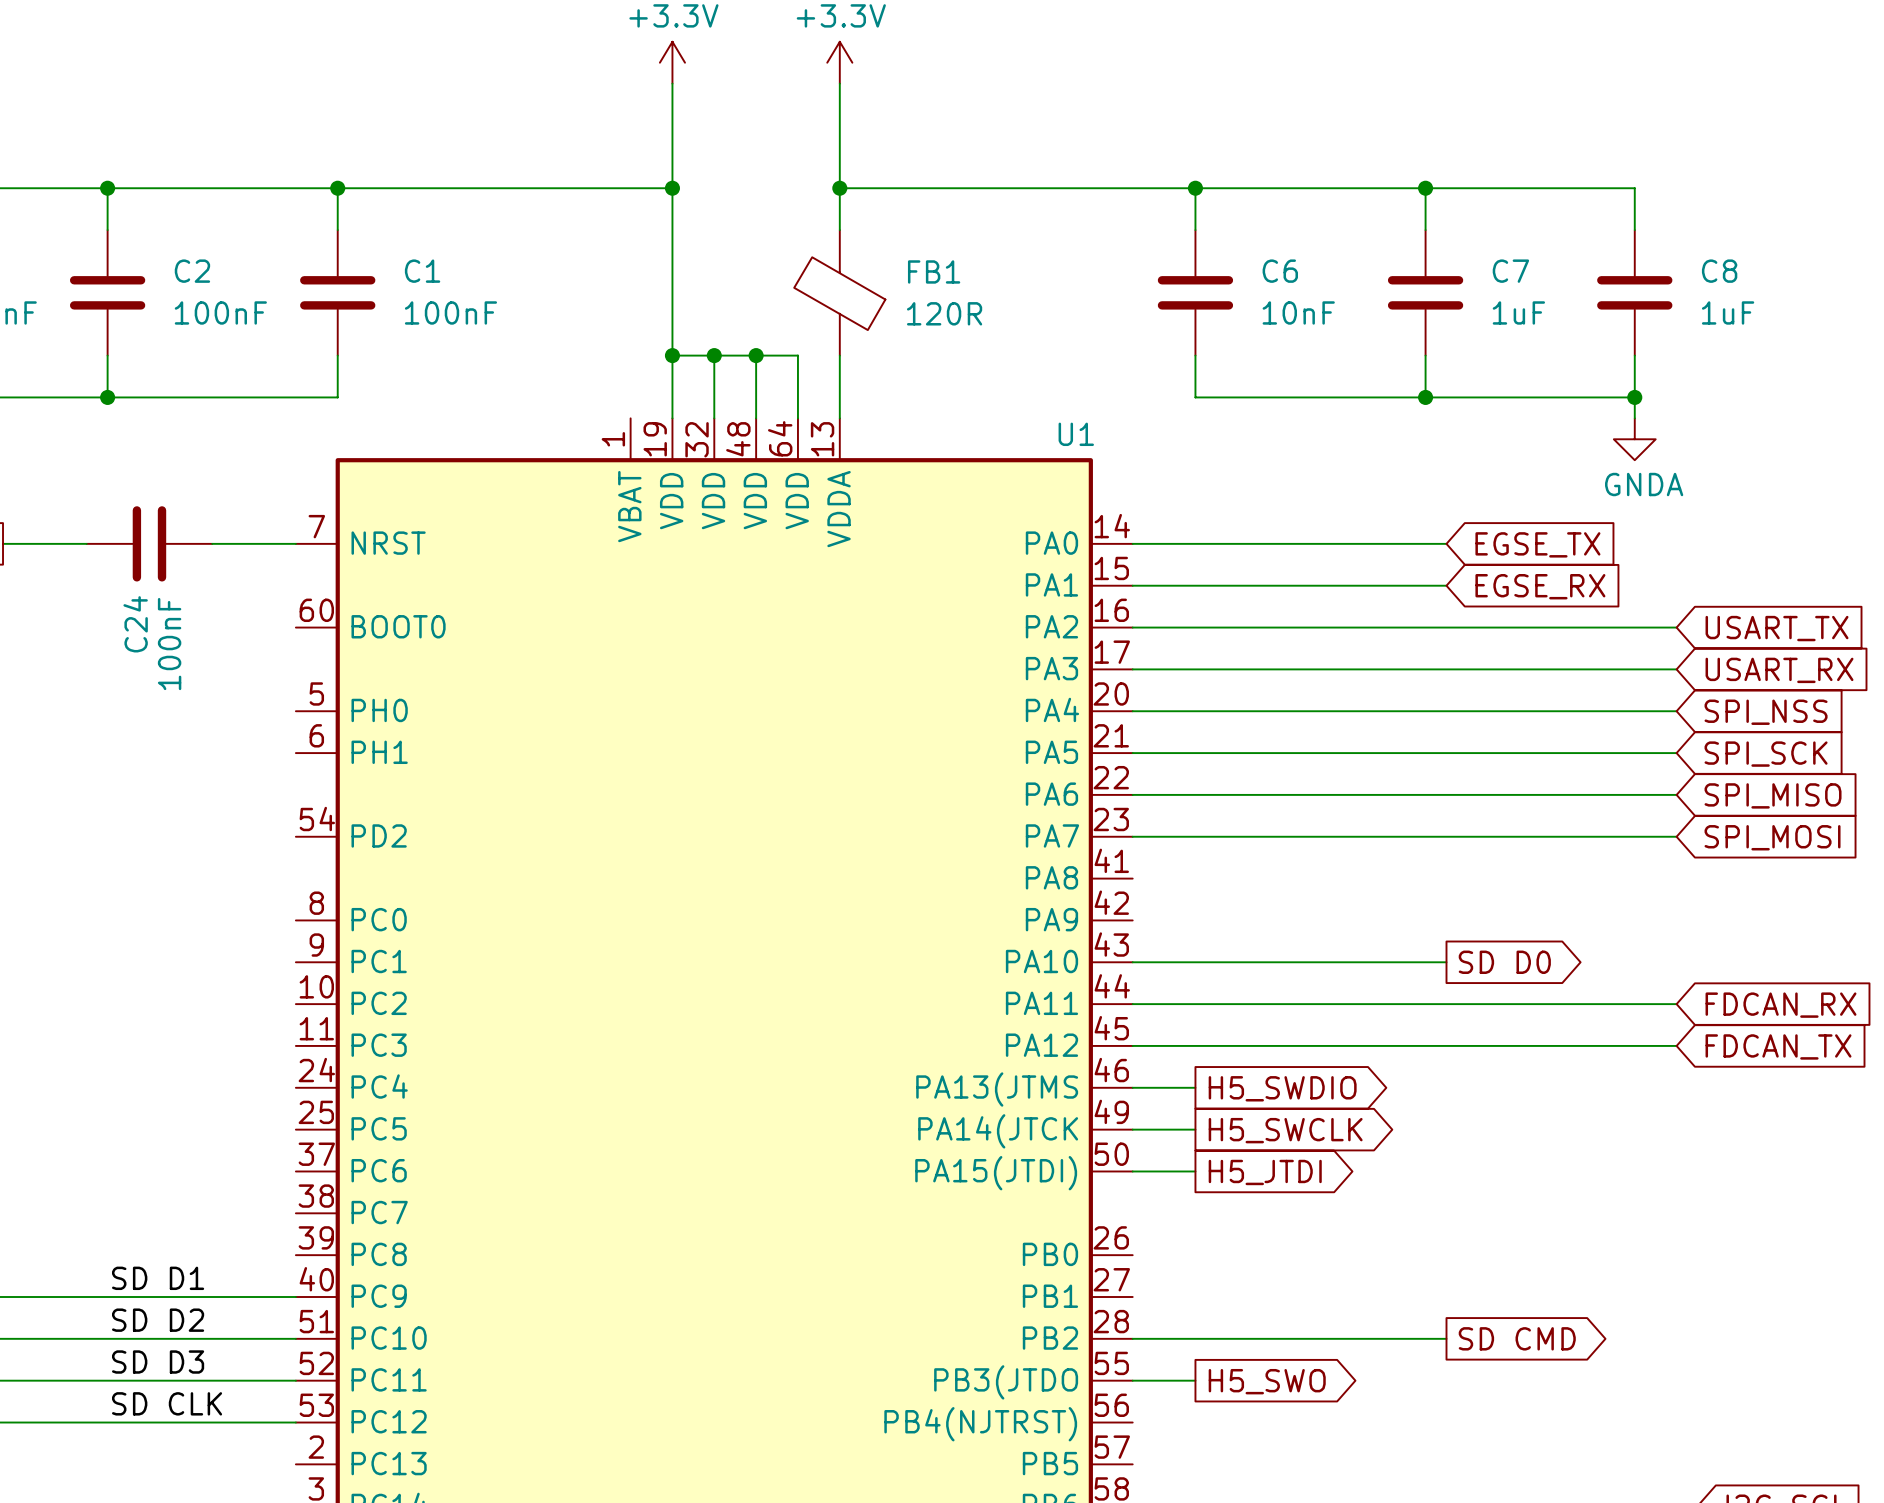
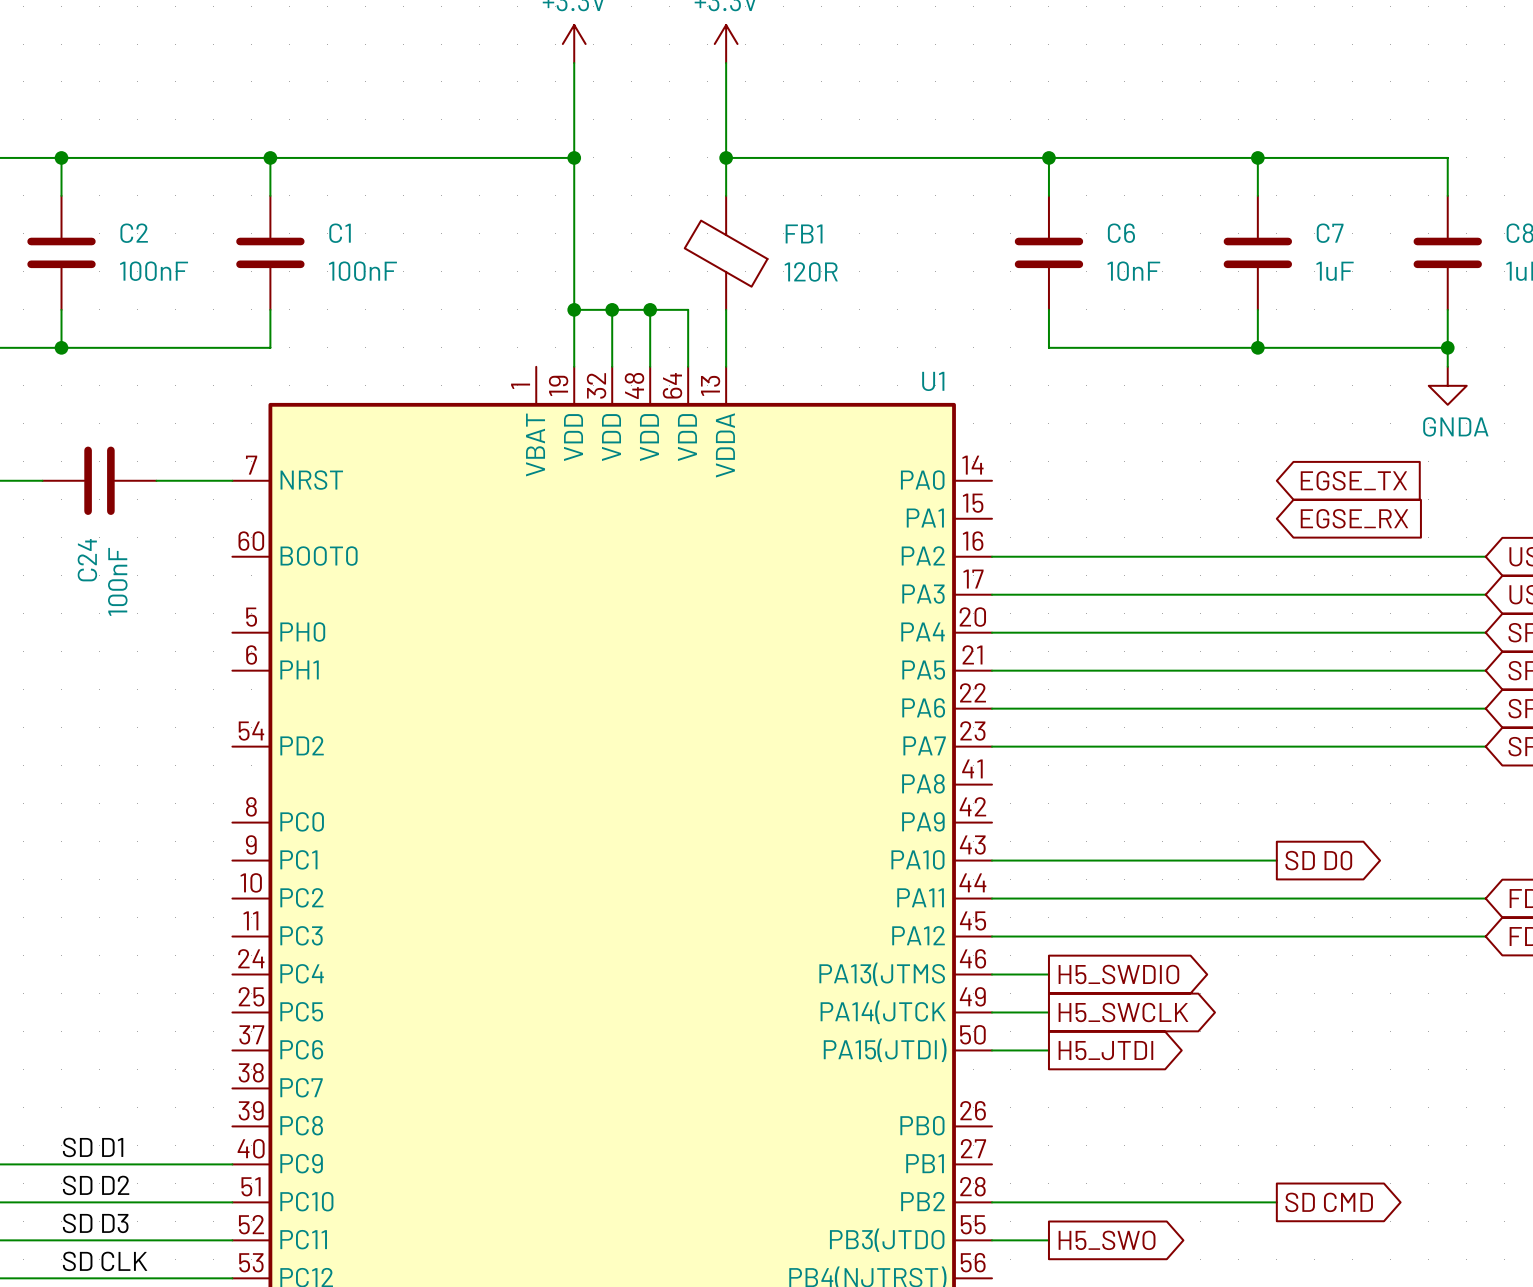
wire: (1132, 543) (1446, 543) -> none
wire: (1132, 585) (1446, 585) -> none

